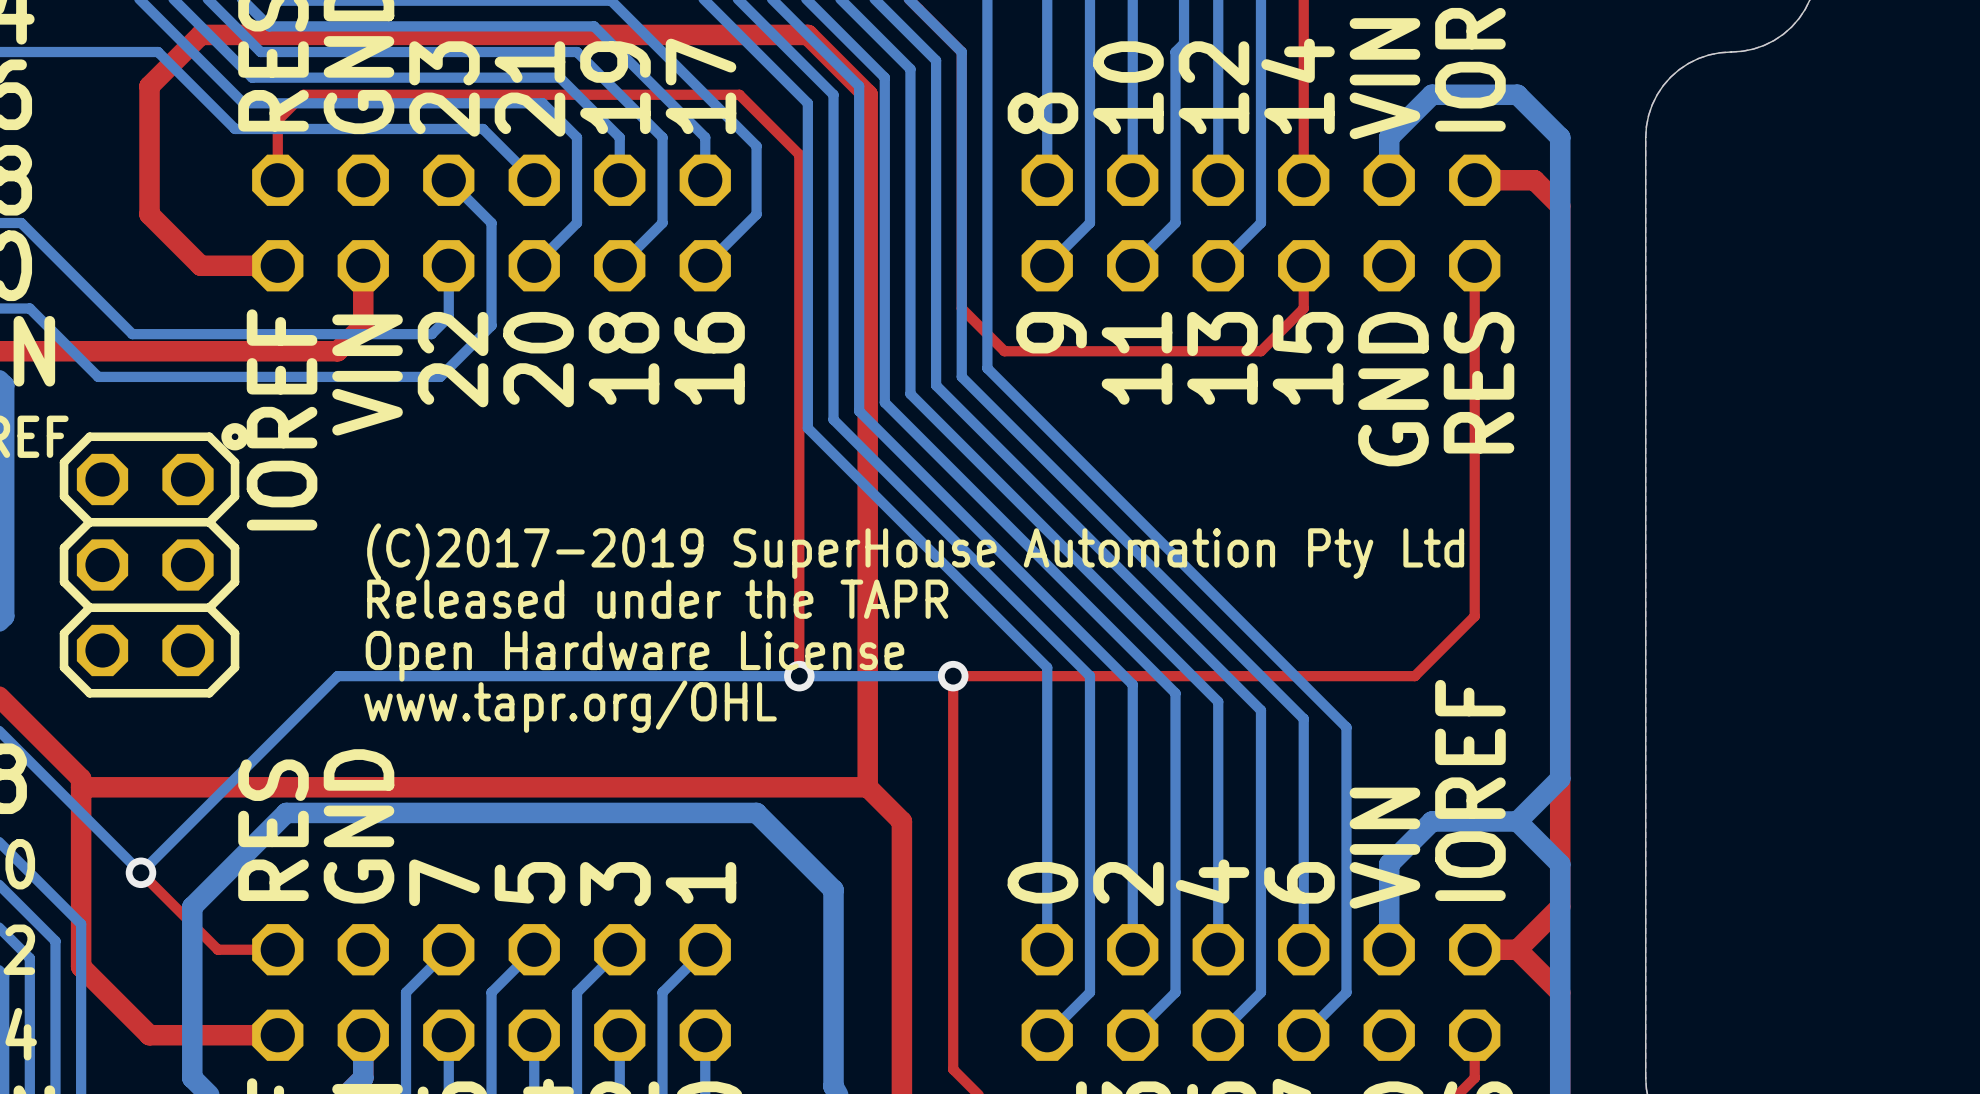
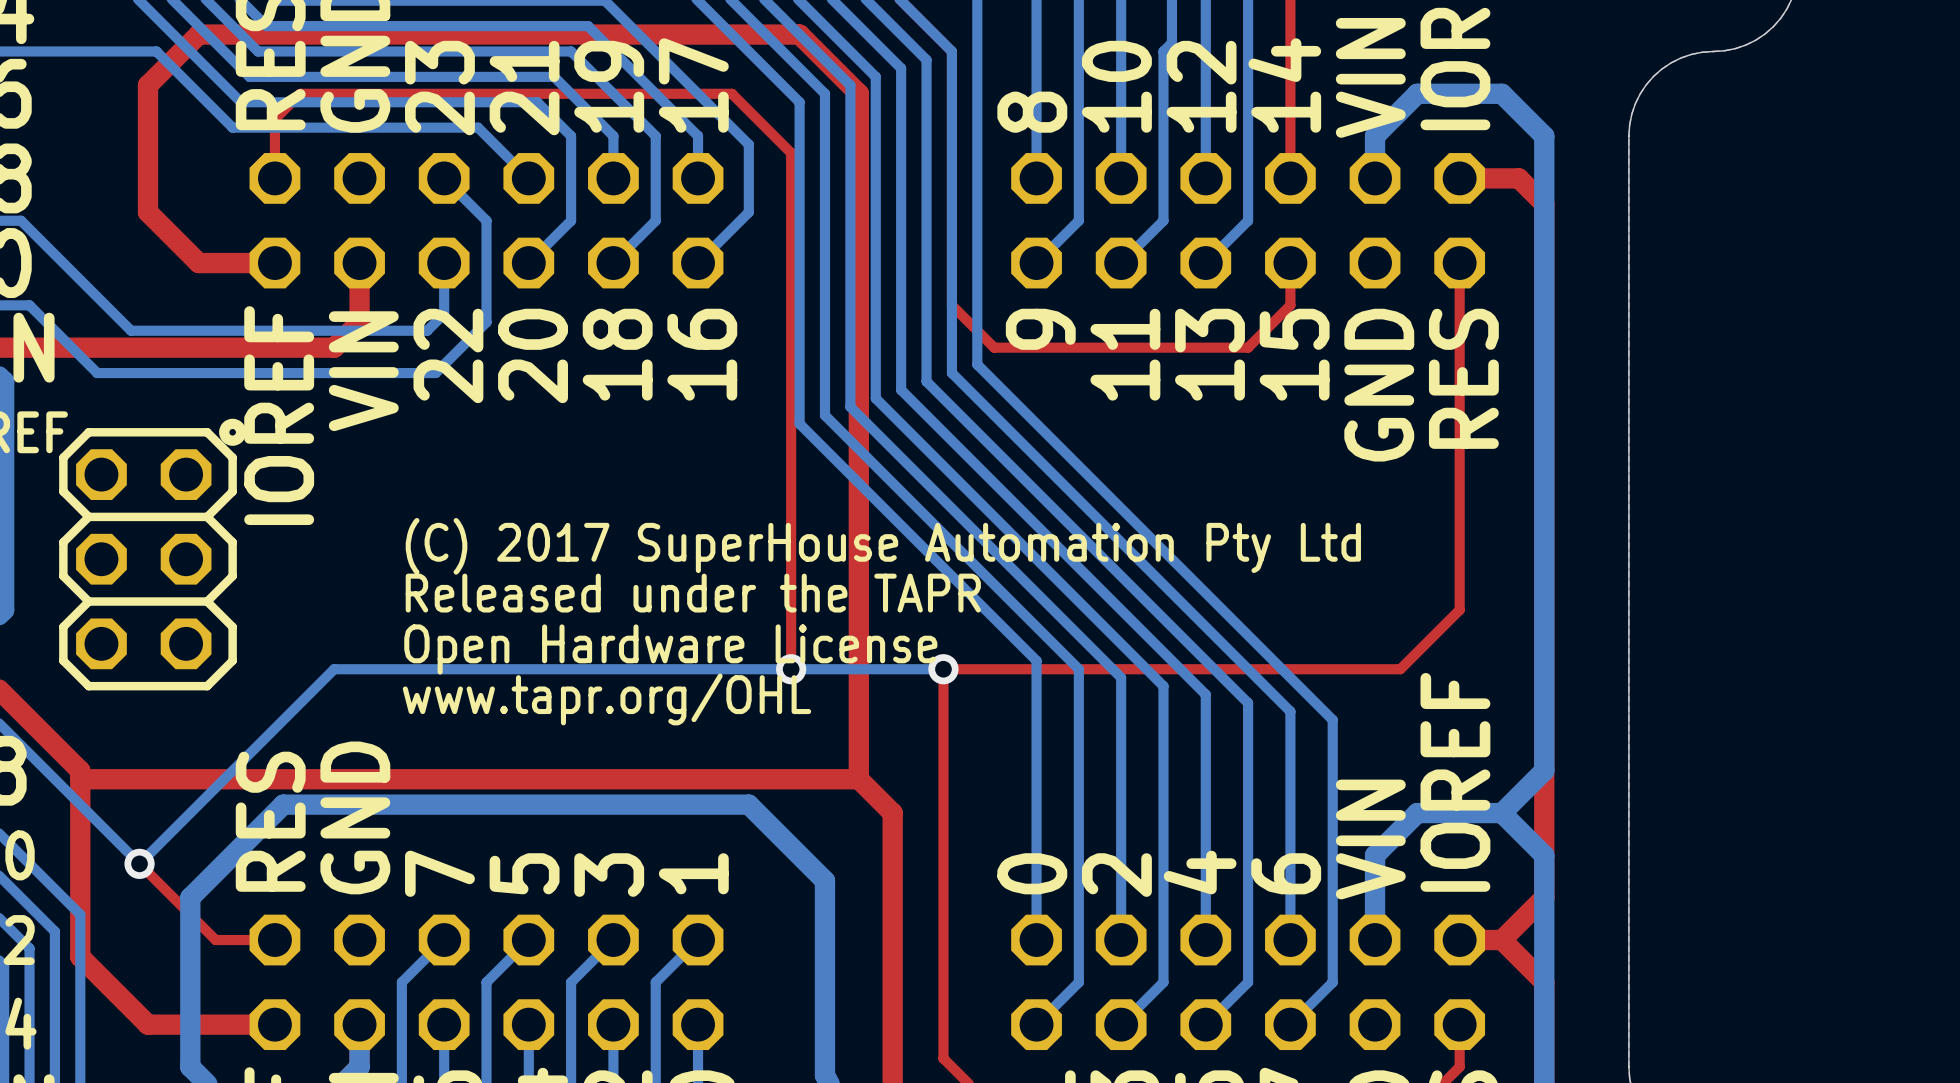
text: (C)2017-2019 SuperHouse Automation Pty Ltd (915, 551) -> (C) 2017 SuperHouse Automation Pty Ltd (883, 546)
text position: Released under the TAPR (657, 599) -> Released under the TAPR (693, 593)
text position: Open Hardware License (634, 656) -> Open Hardware License (670, 649)
text position: www.tapr.org/OHL (570, 706) -> www.tapr.org/OHL (606, 699)

